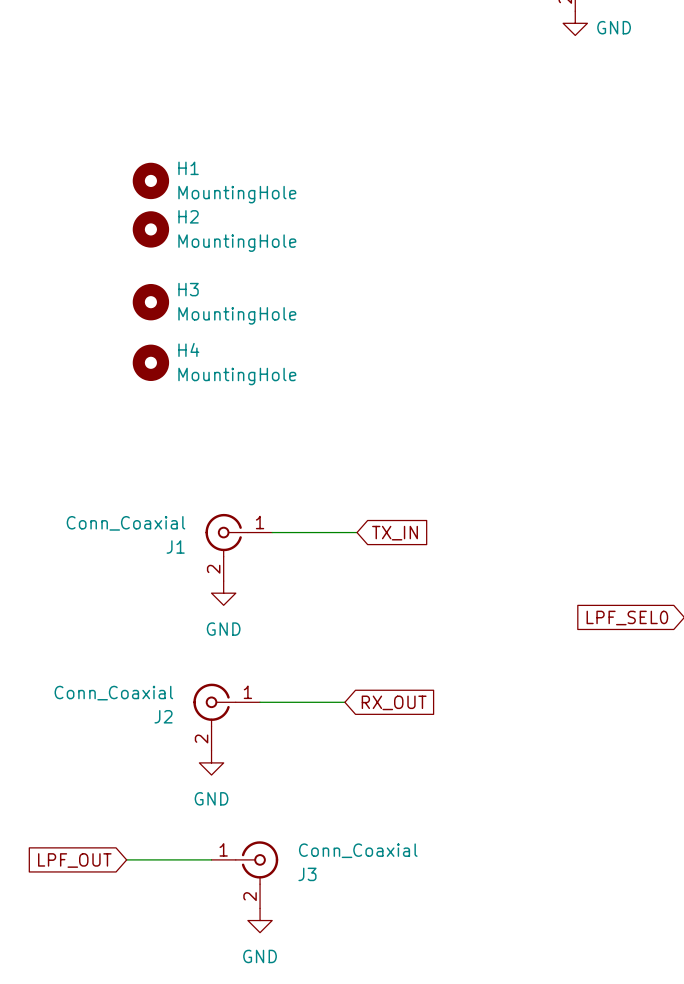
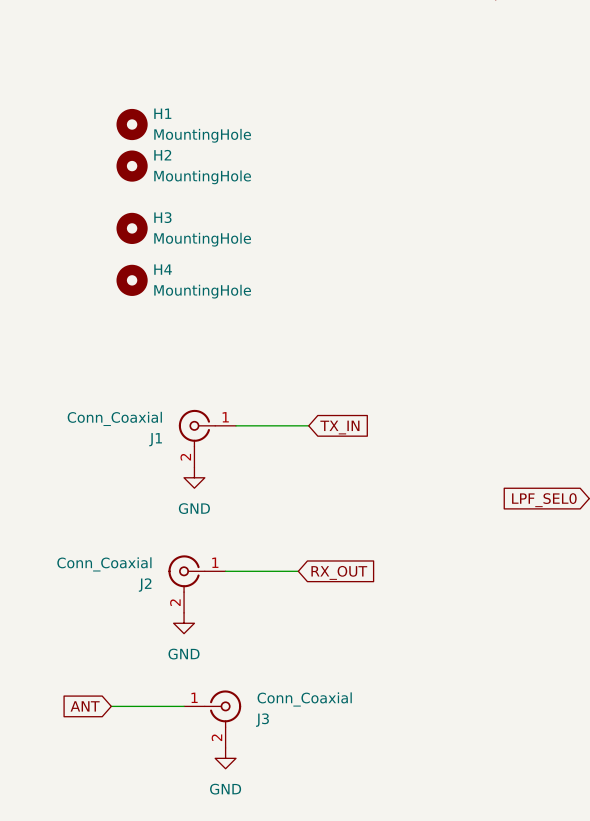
global label: LPF_OUT (74, 860) -> ANT (85, 706)

